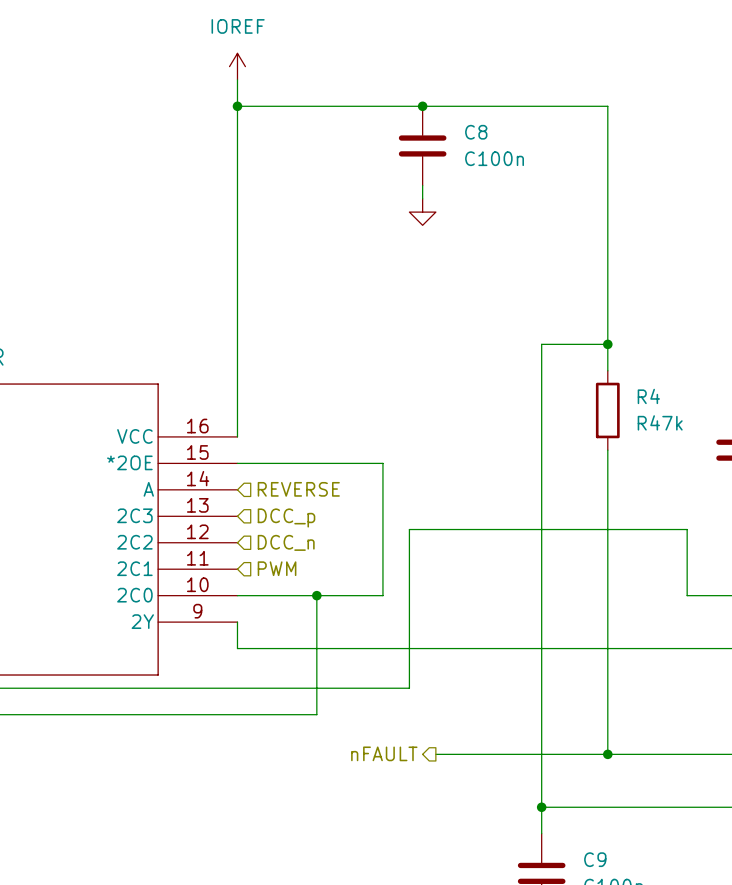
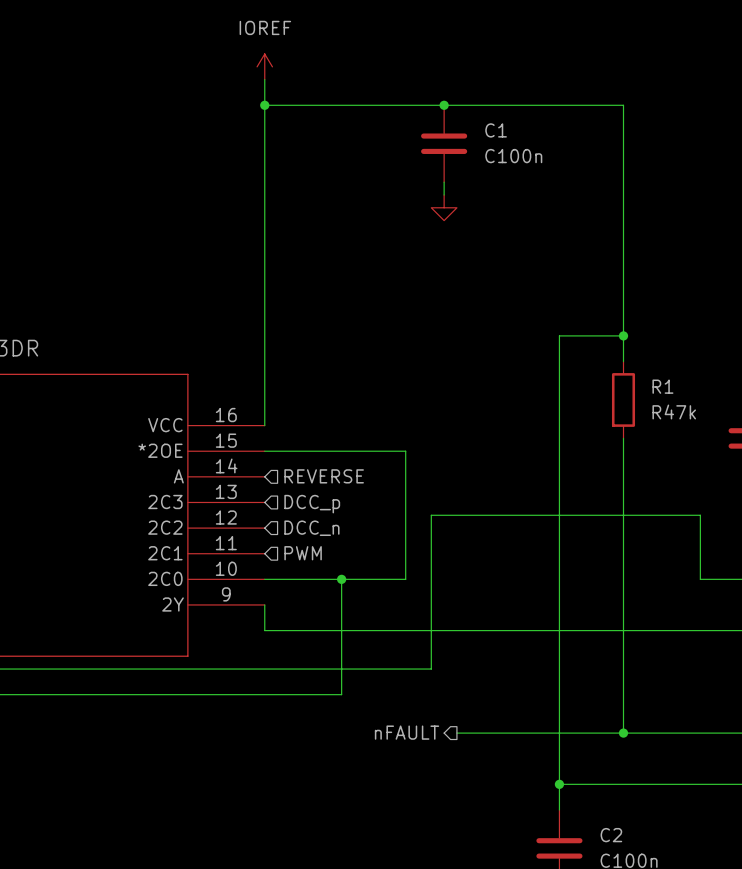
C8 name: C8 (476, 132) -> C1 (496, 130)
R4 name: R4 (648, 396) -> R1 (662, 386)
C9 name: C9 (595, 859) -> C2 (611, 835)

